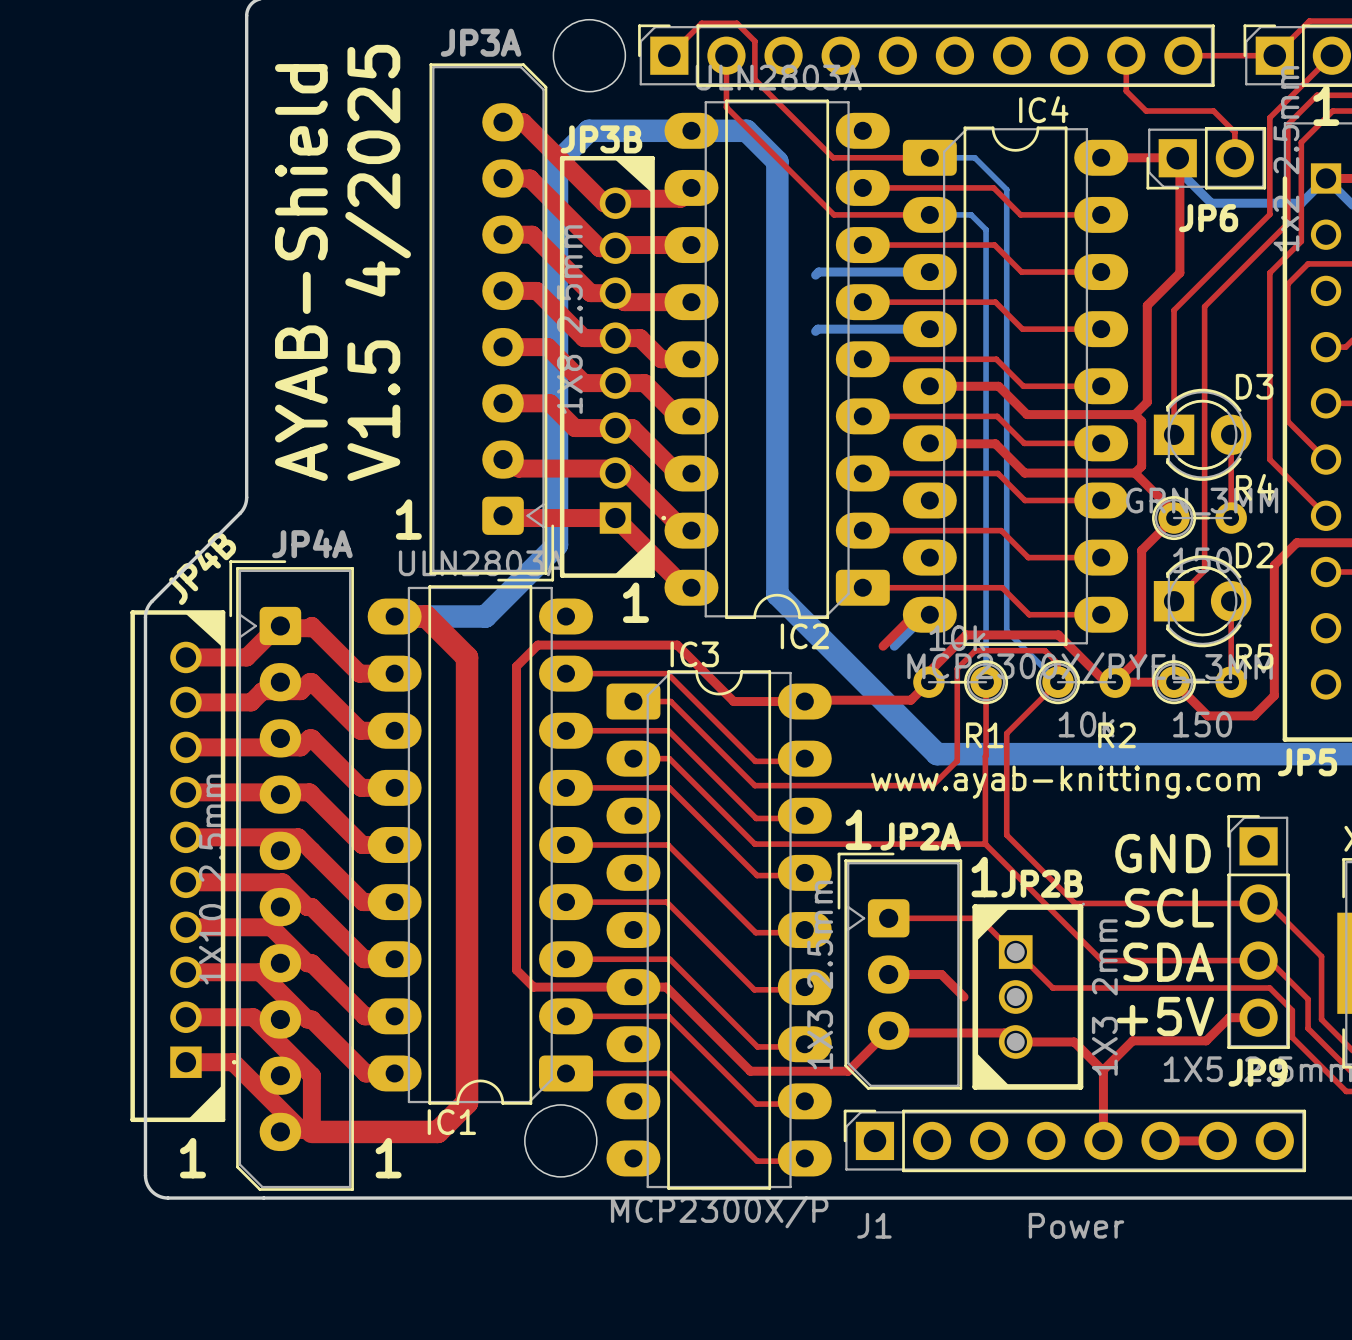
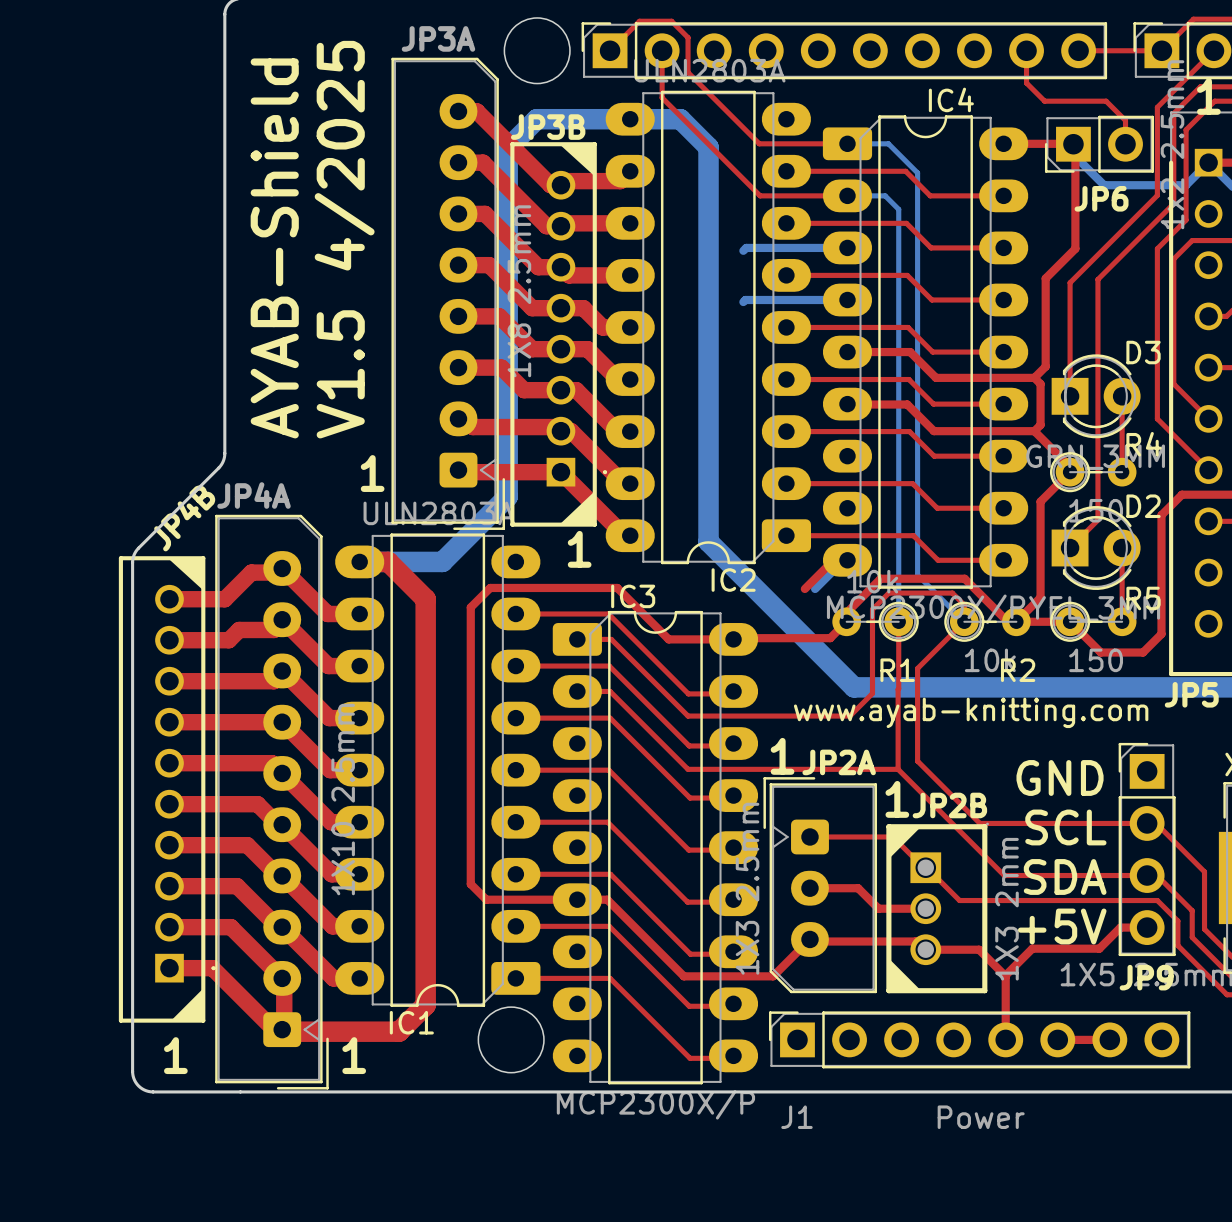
JP4A rotation: 0° (291, 875) -> 180° (271, 802)
top track: none -> (878, 908) (927, 908)

